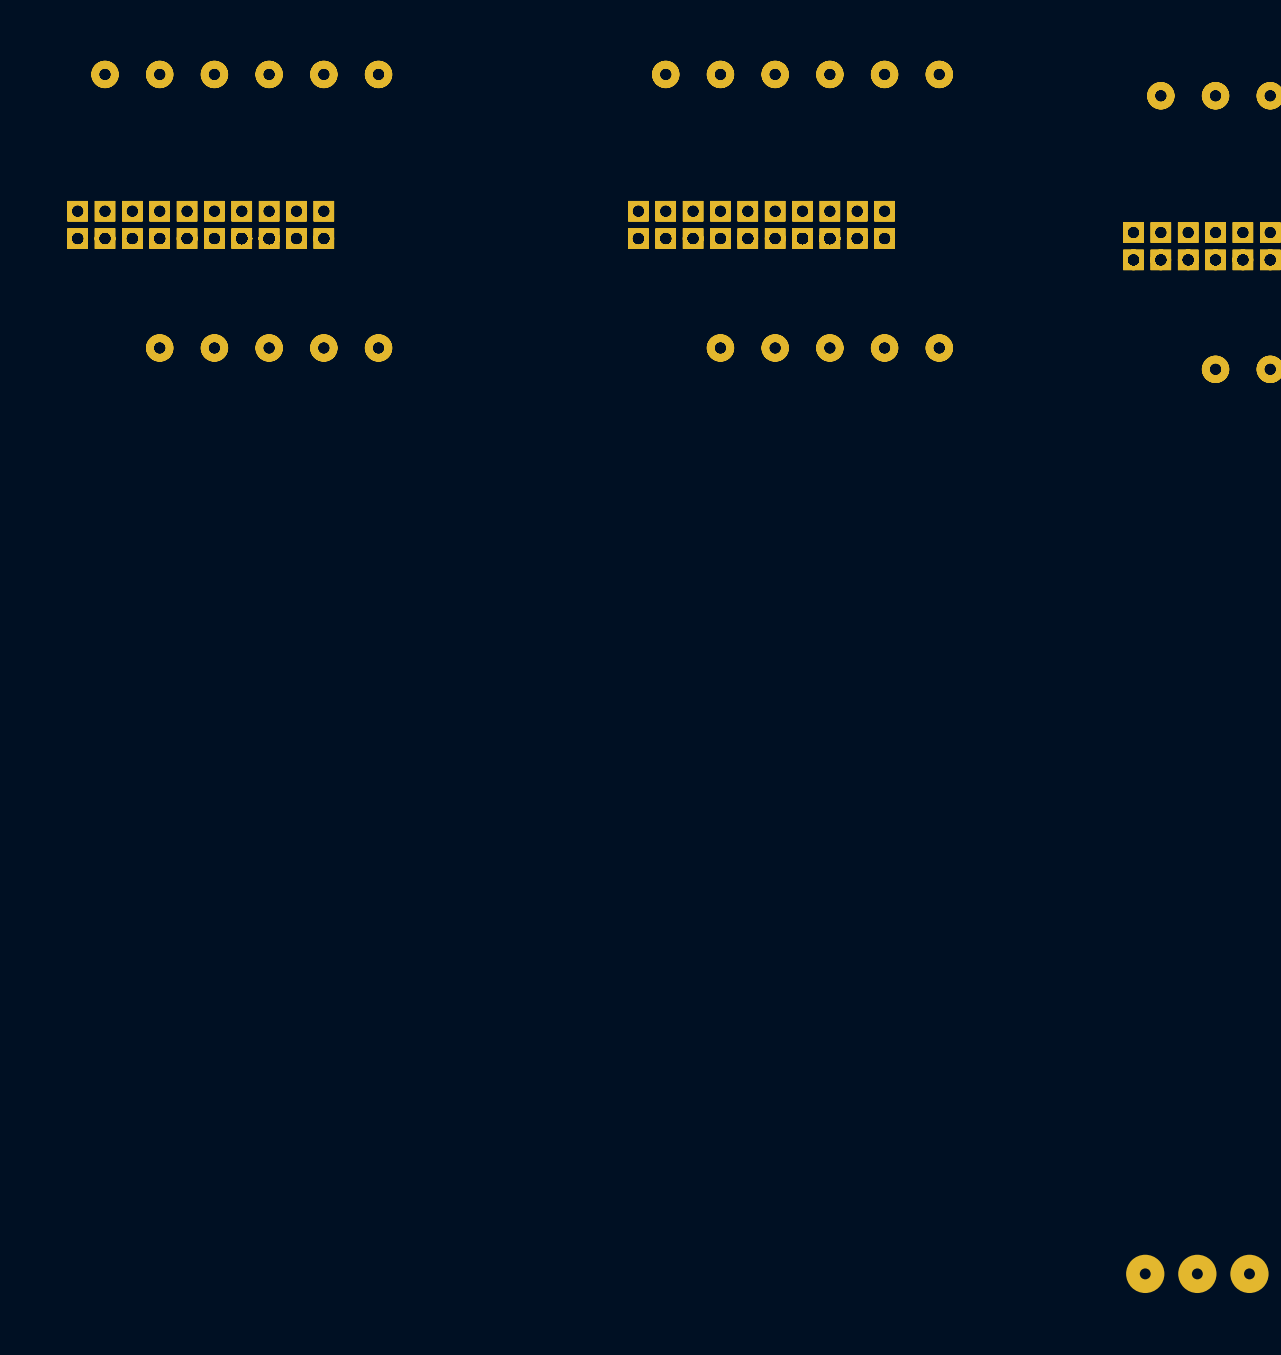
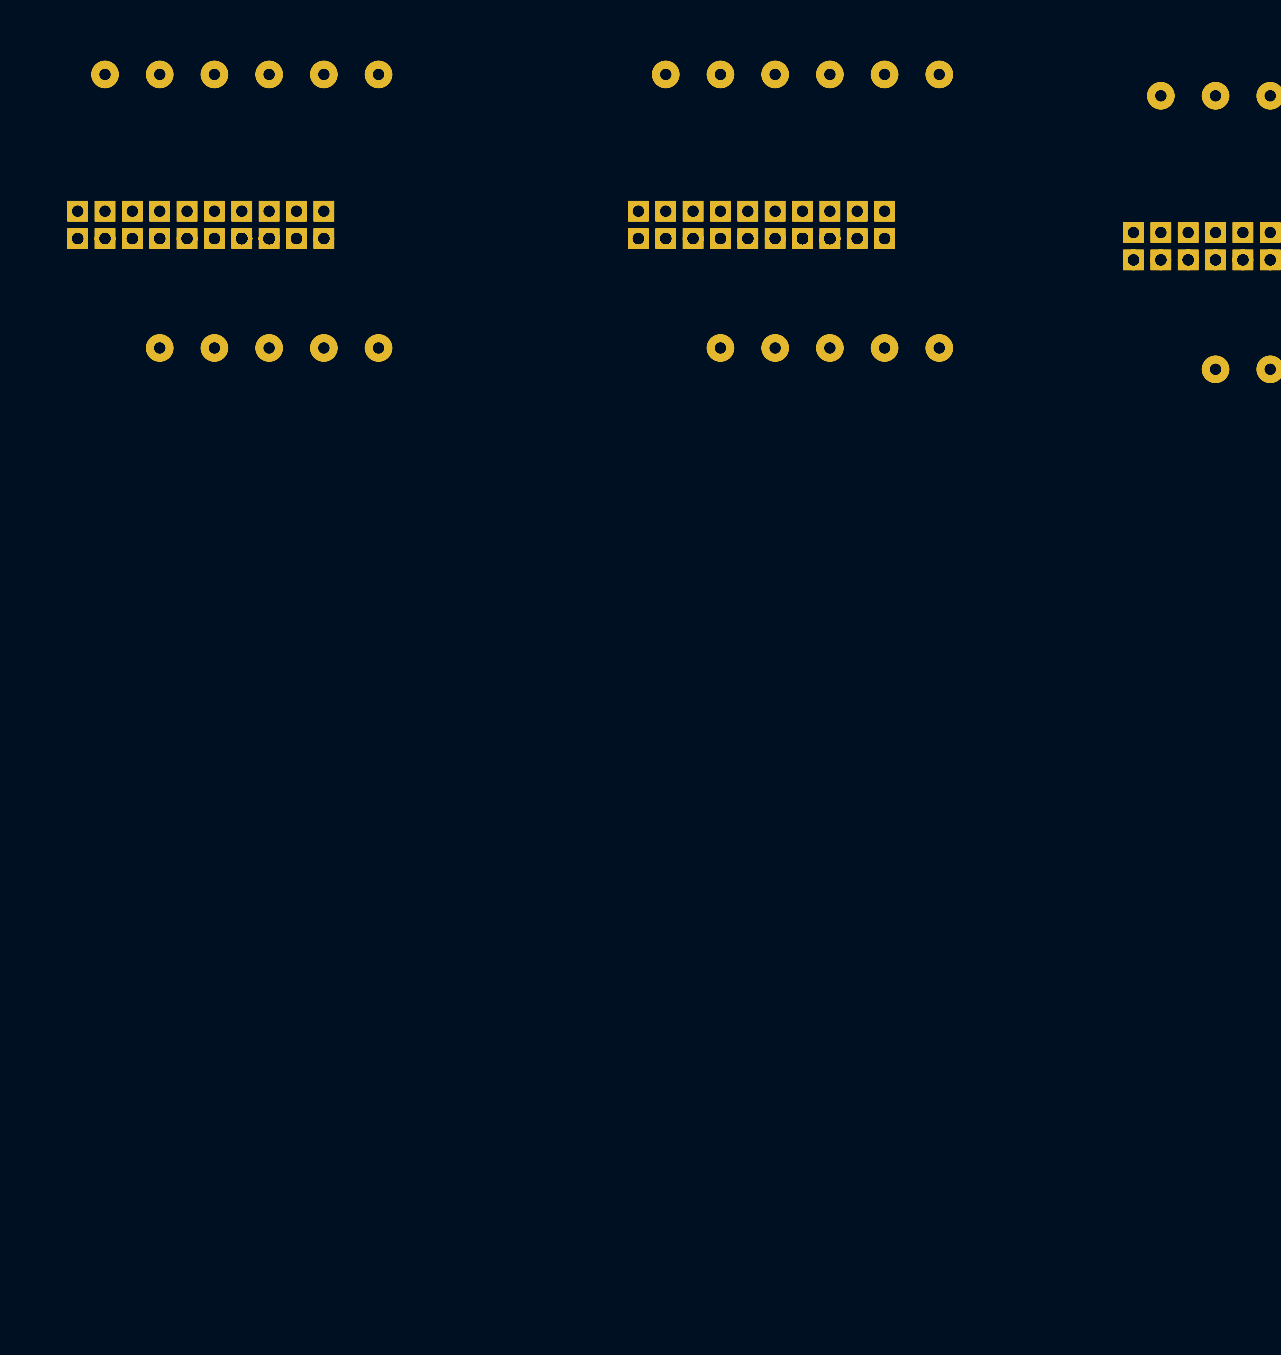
part: (1145, 1273) -> none
part: (1197, 1273) -> none
part: (1249, 1273) -> none

